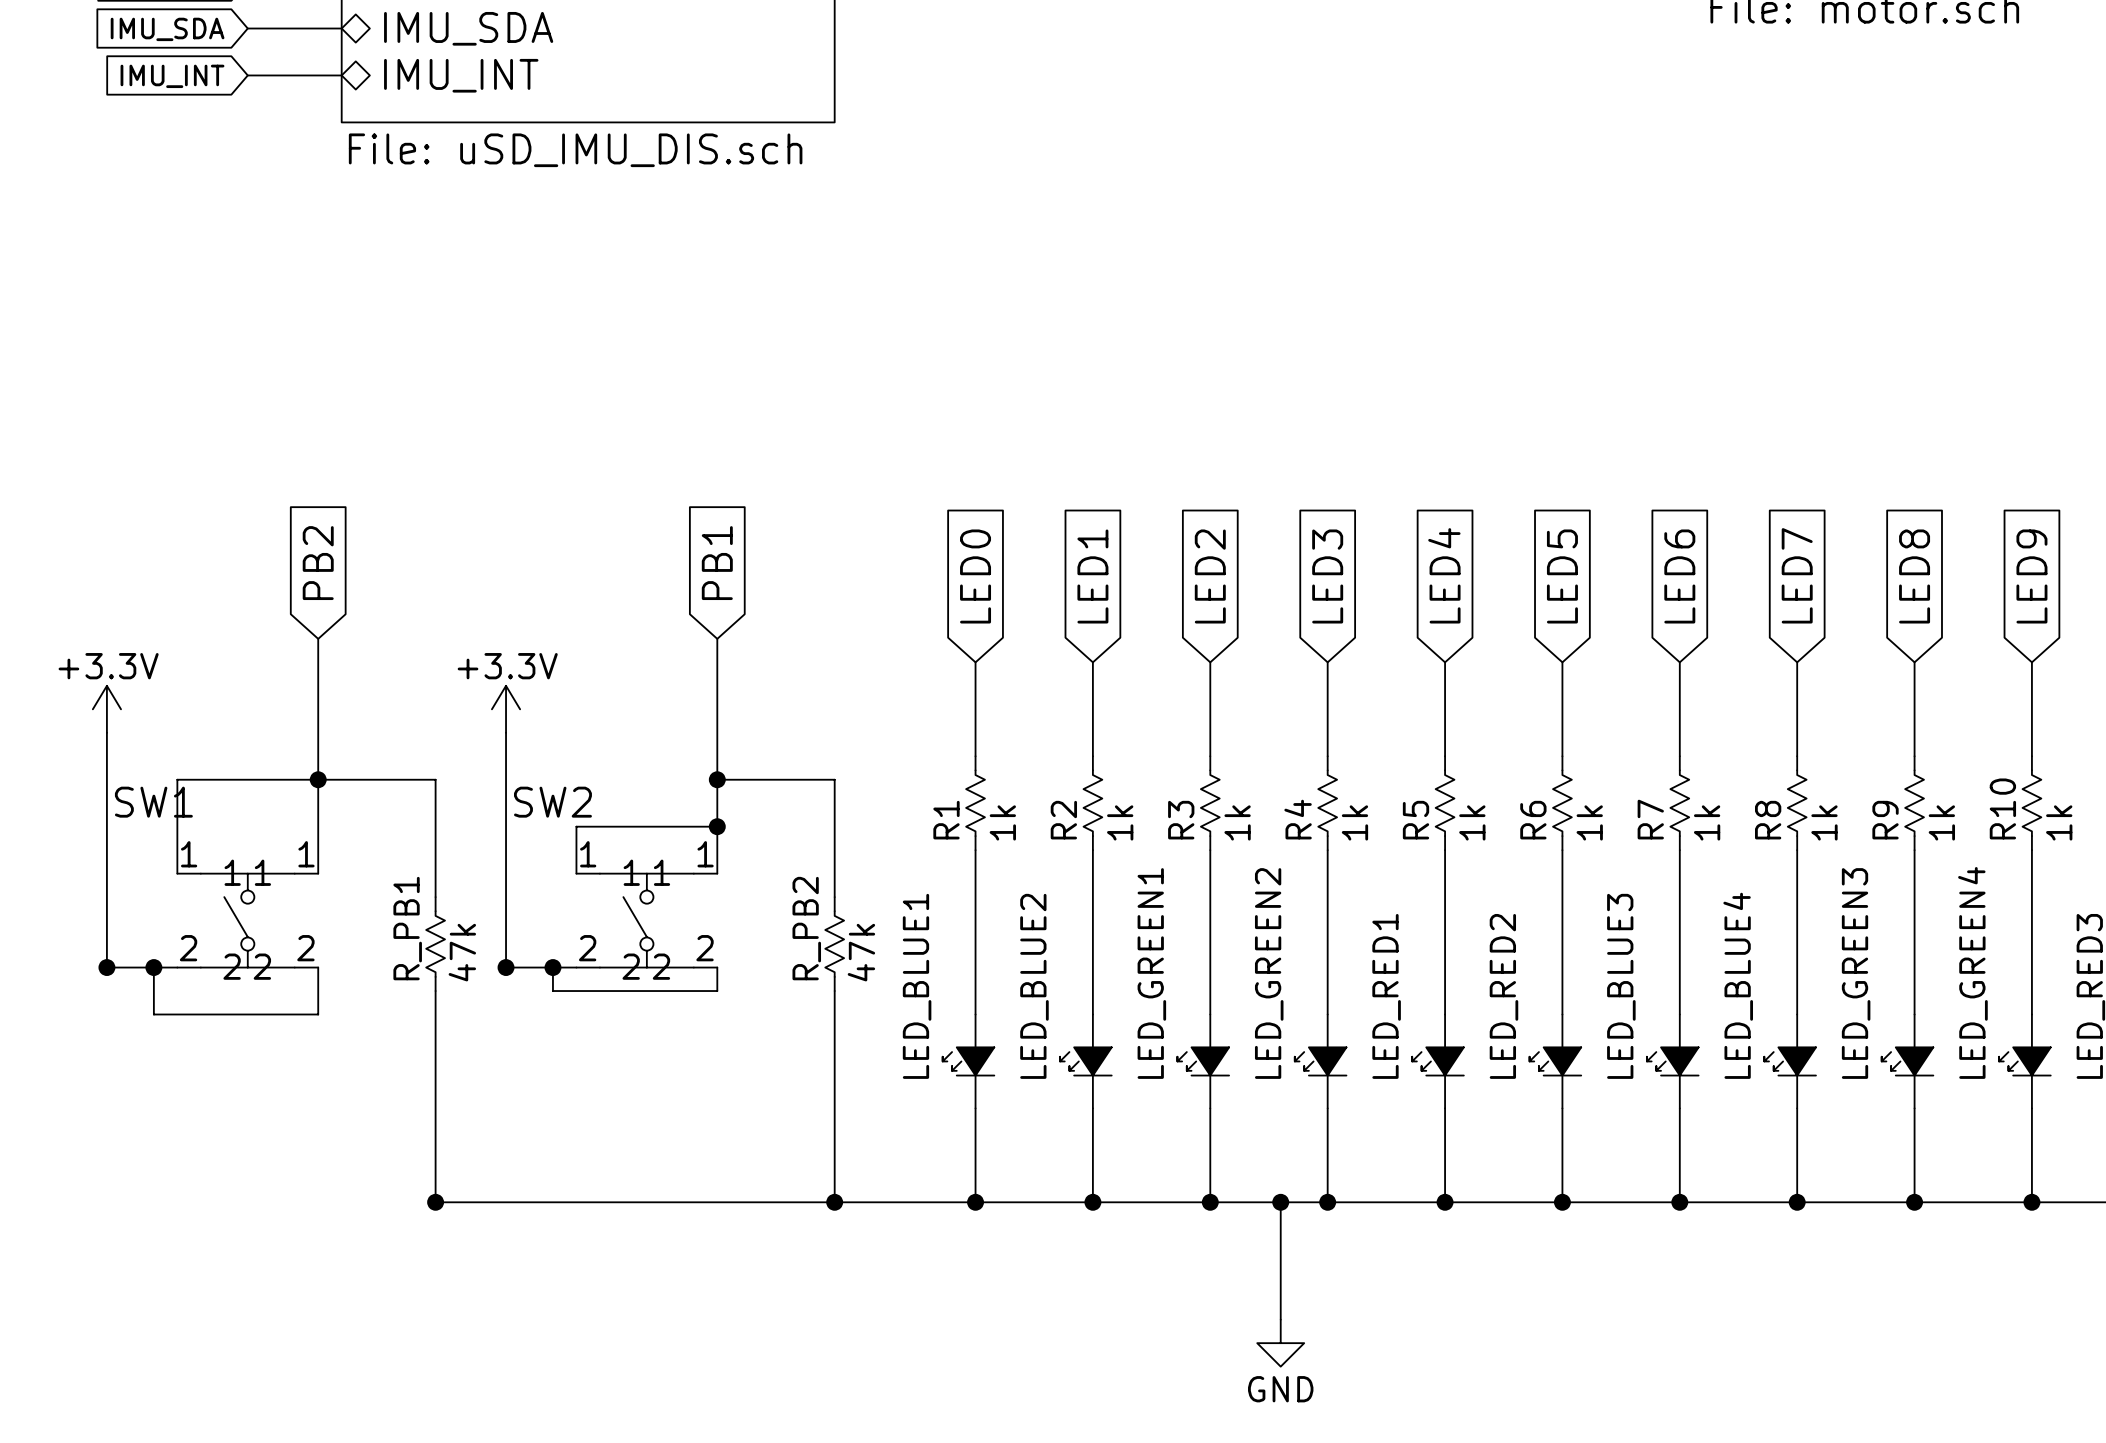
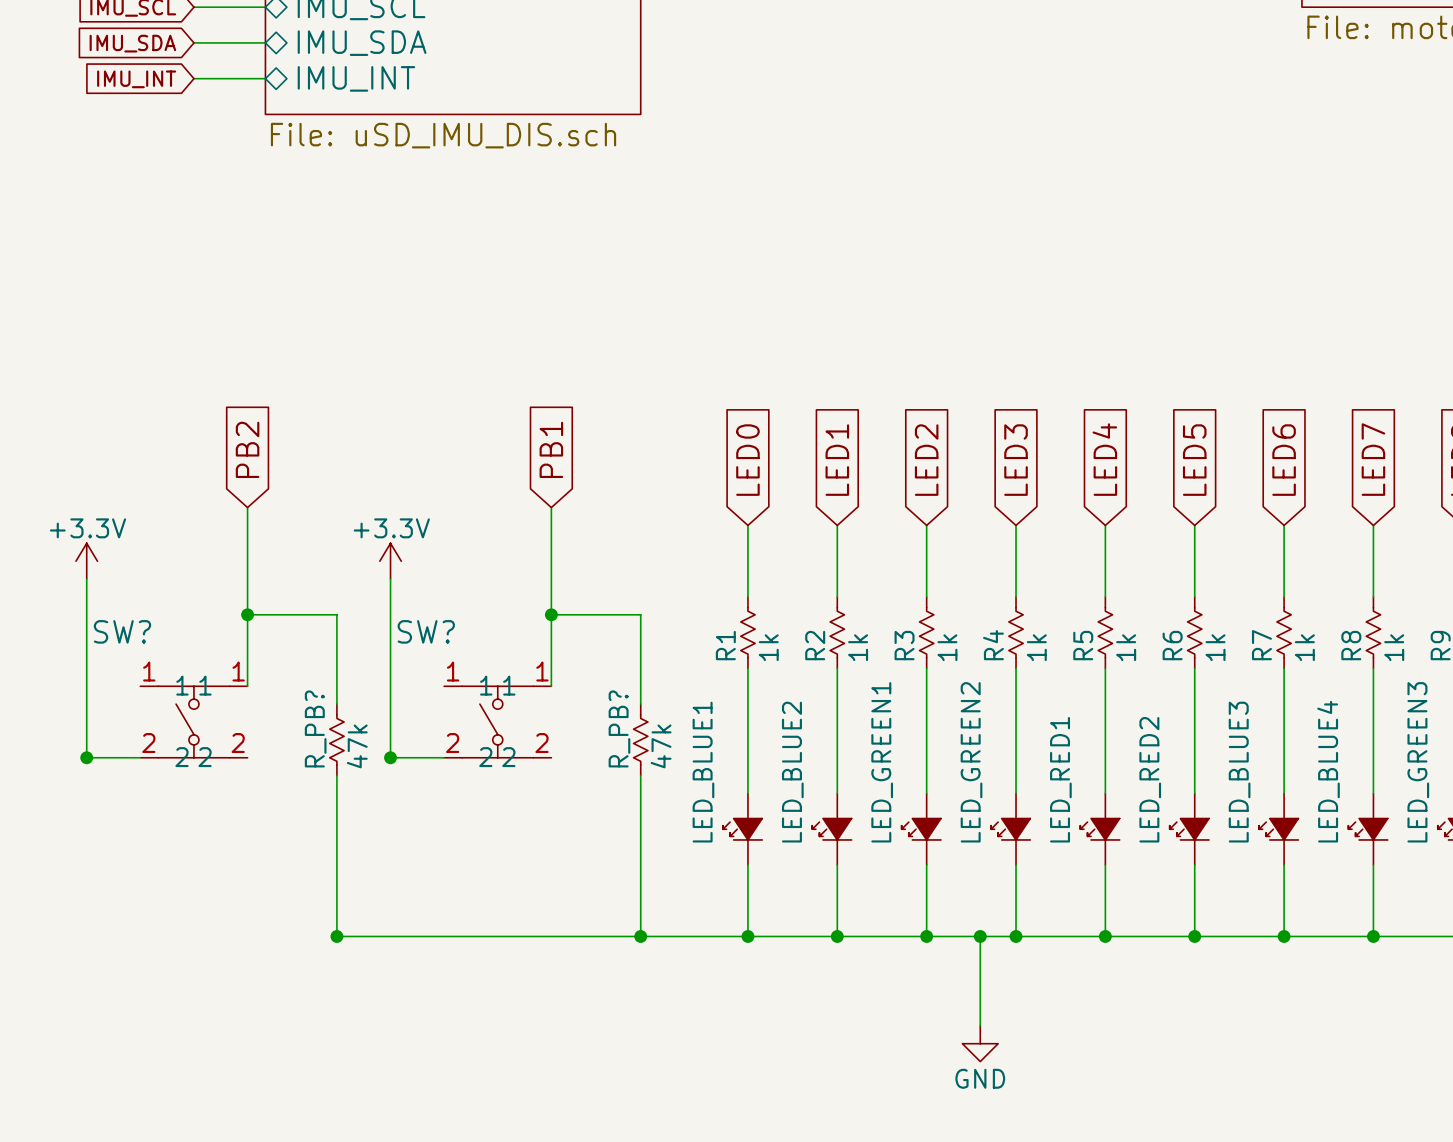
wire: (318, 779) (177, 779) (177, 873) -> none
SW1 name: SW1 (153, 802) -> SW? (122, 631)
SW2 name: SW2 (552, 802) -> SW? (426, 631)
wire: (717, 826) (576, 826) (576, 873) -> none
junction: (717, 826) -> none
R_PB1 name: R_PB1 (407, 928) -> R_PB? (315, 728)
R_PB2 name: R_PB2 (806, 928) -> R_PB? (619, 728)
wire: (153, 967) (153, 1014) (318, 1014) (318, 967) -> none
junction: (153, 967) -> none
wire: (552, 967) (552, 991) (717, 991) (717, 967) -> none
junction: (552, 967) -> none

